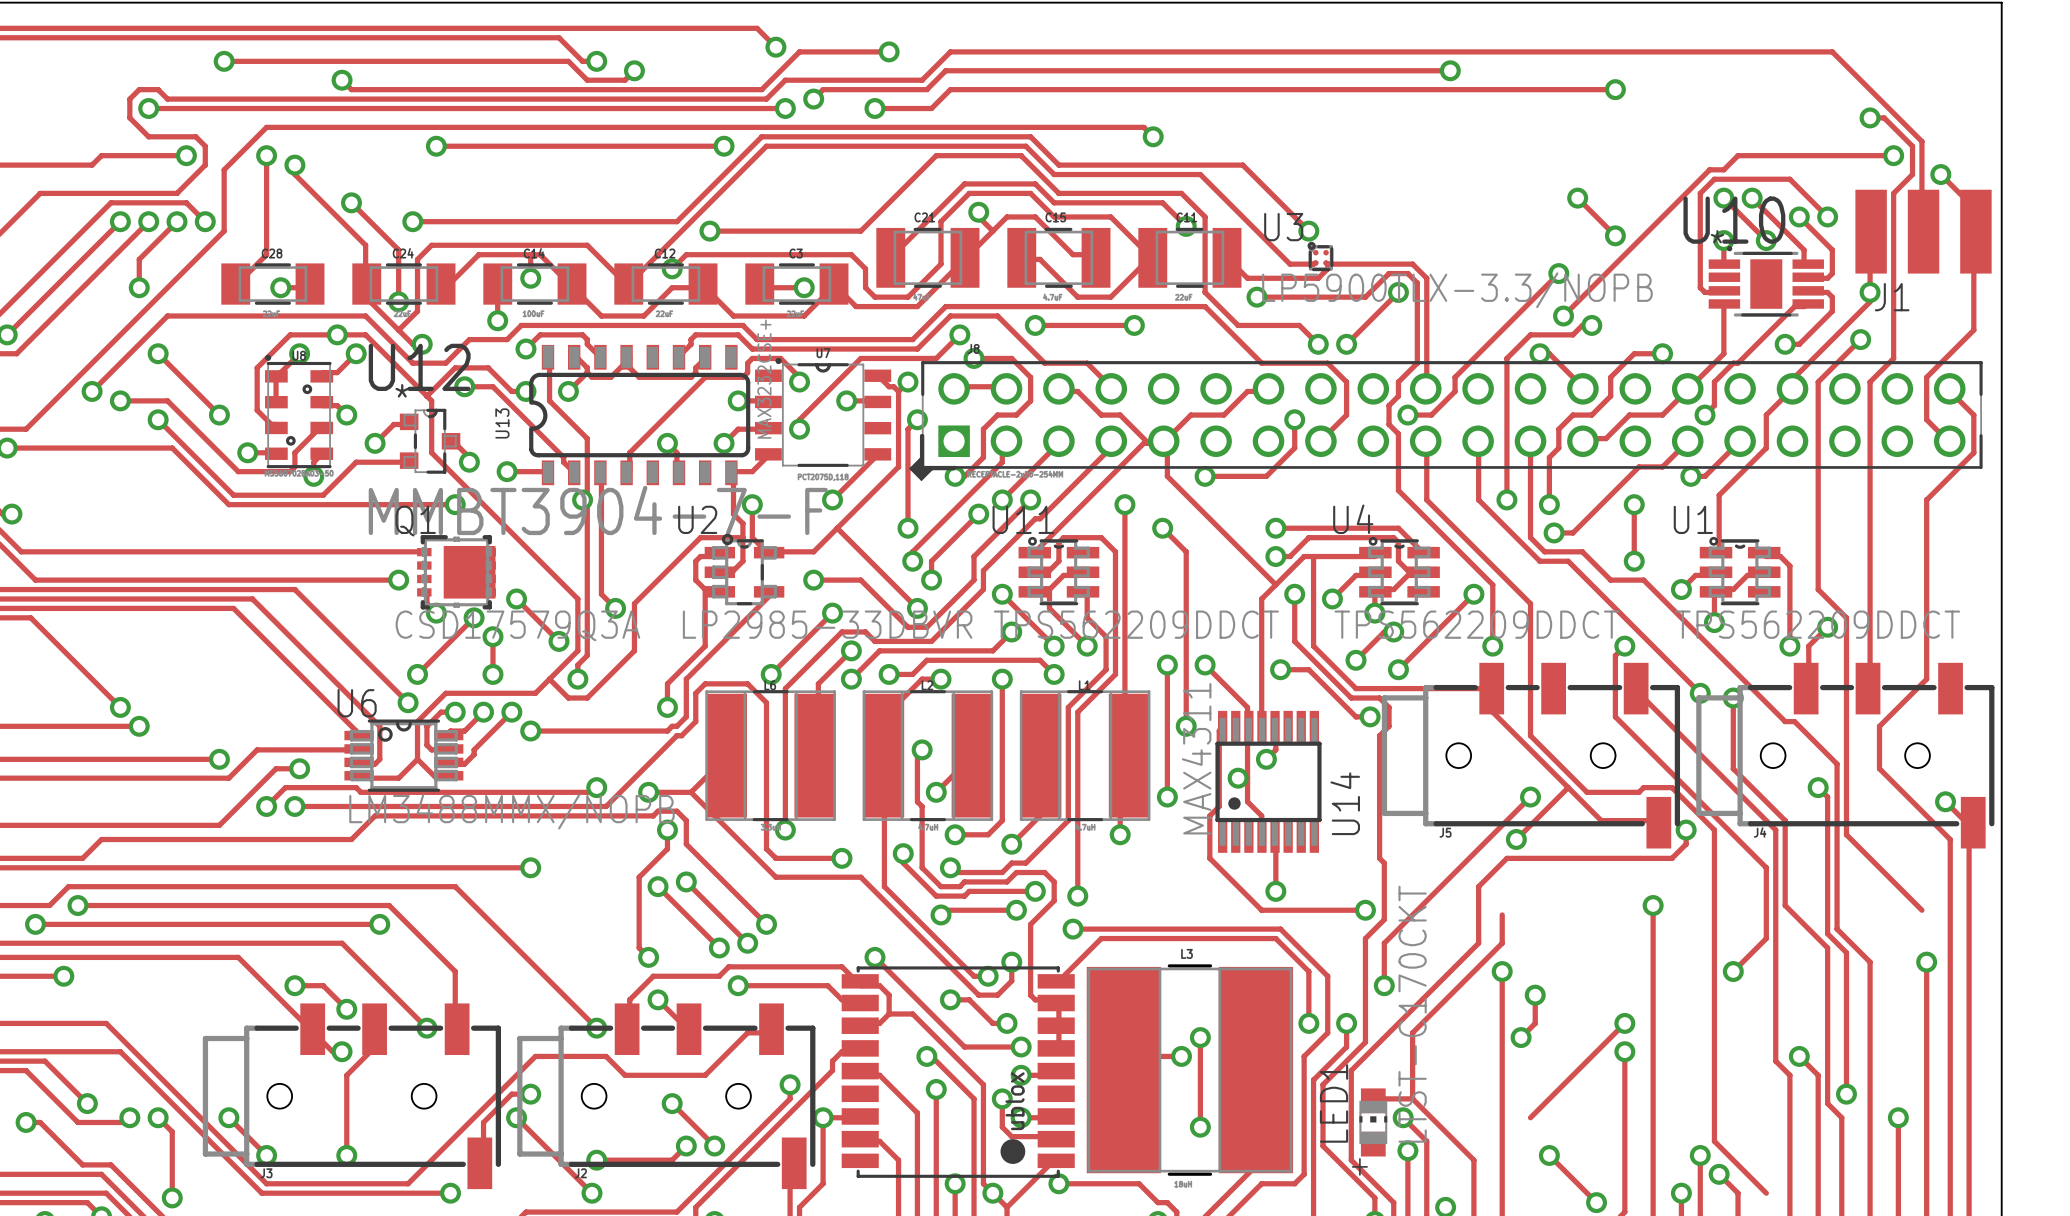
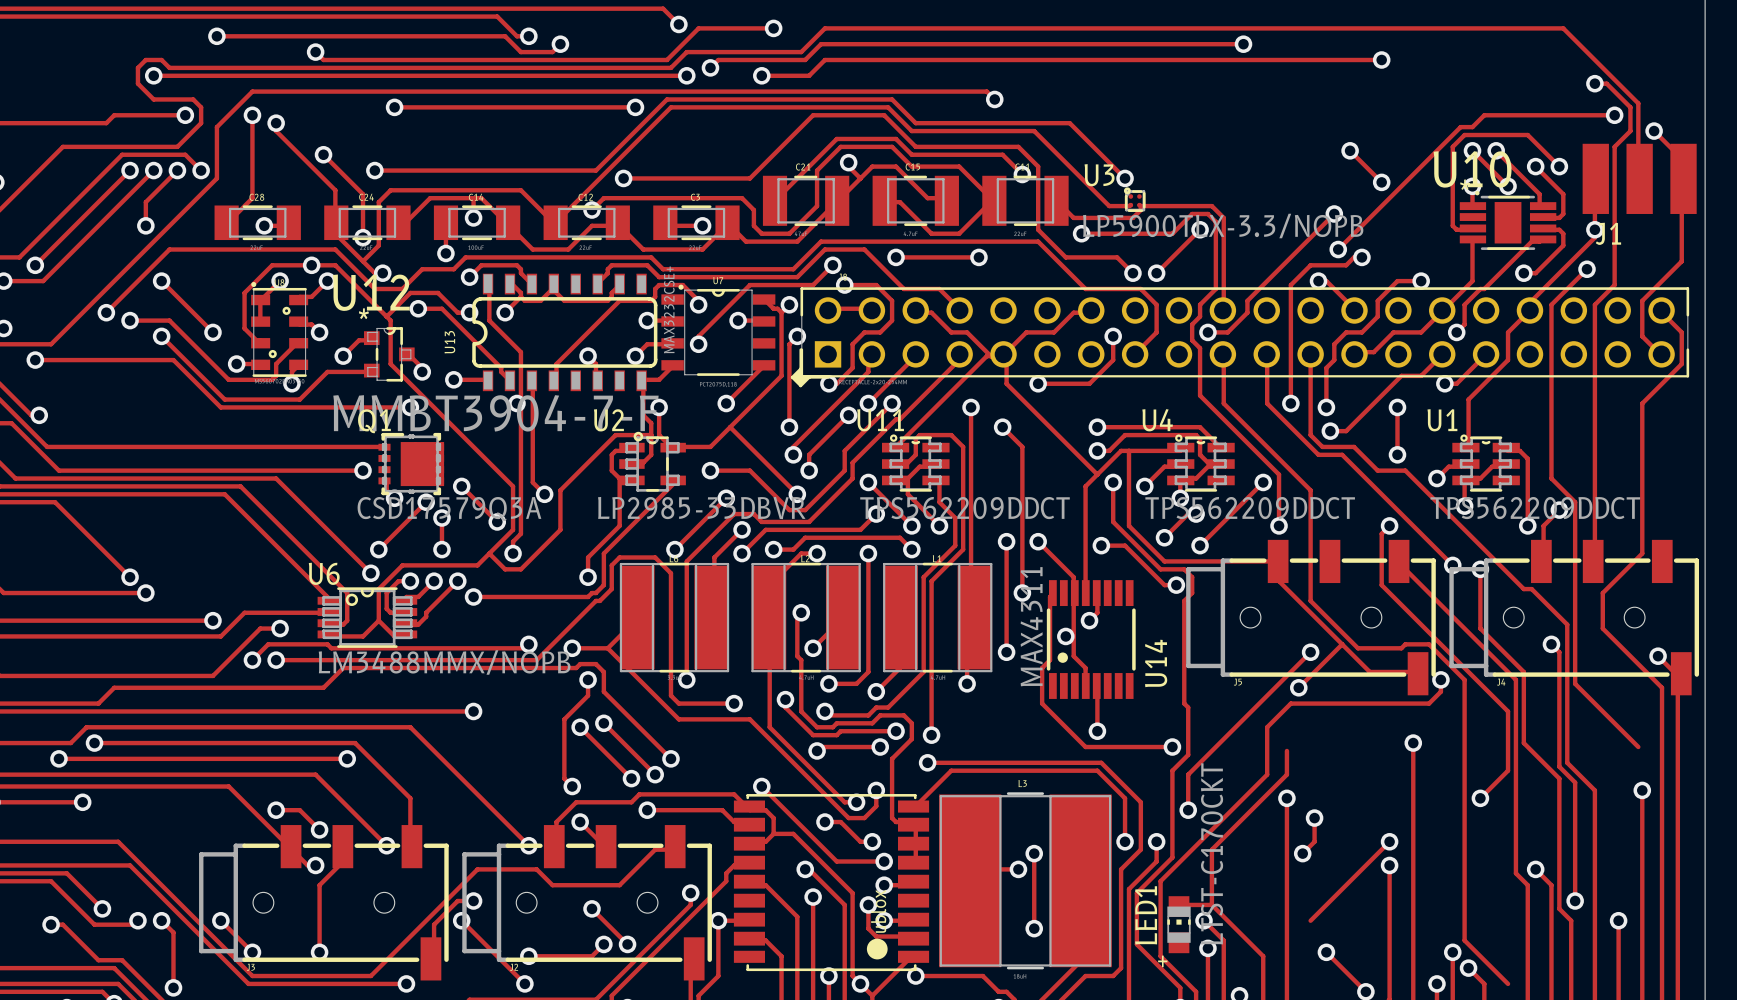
U14 footprint: [1215, 710, 1322, 853] -> [1046, 580, 1136, 699]

